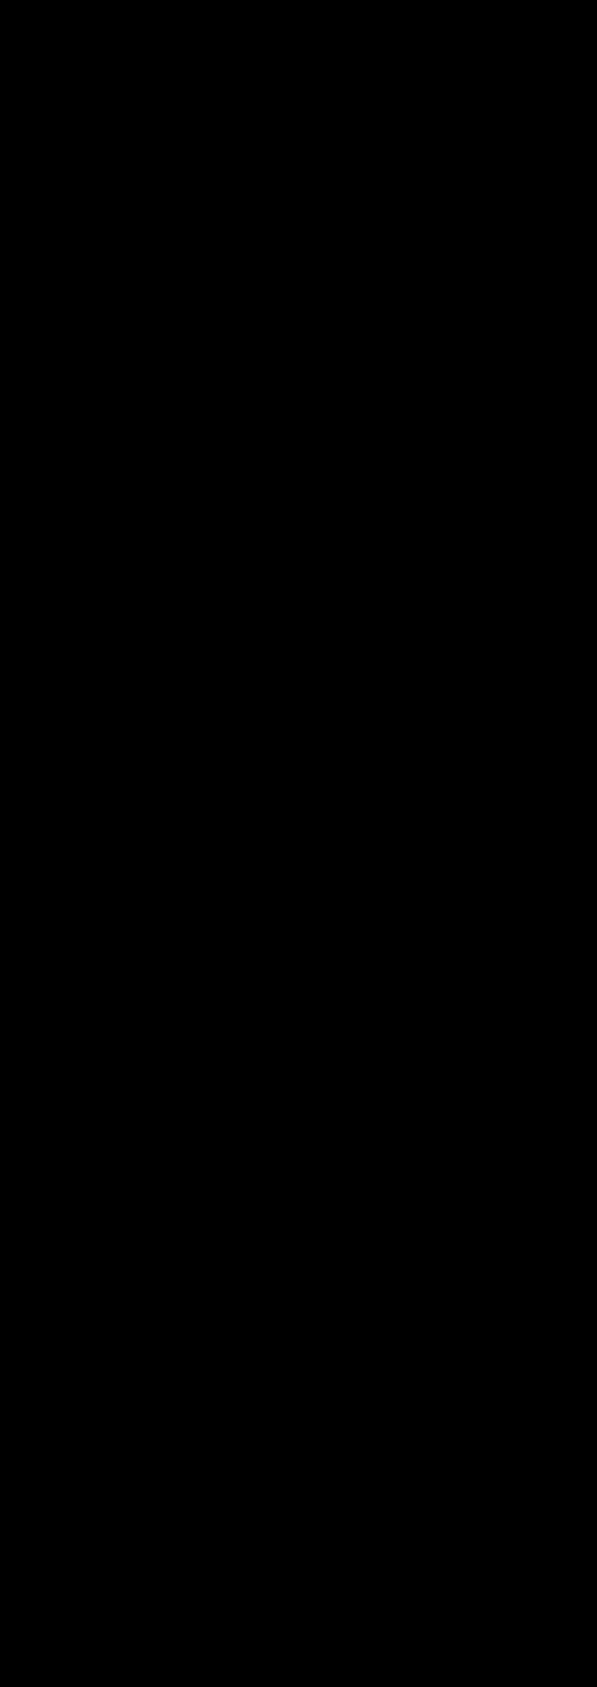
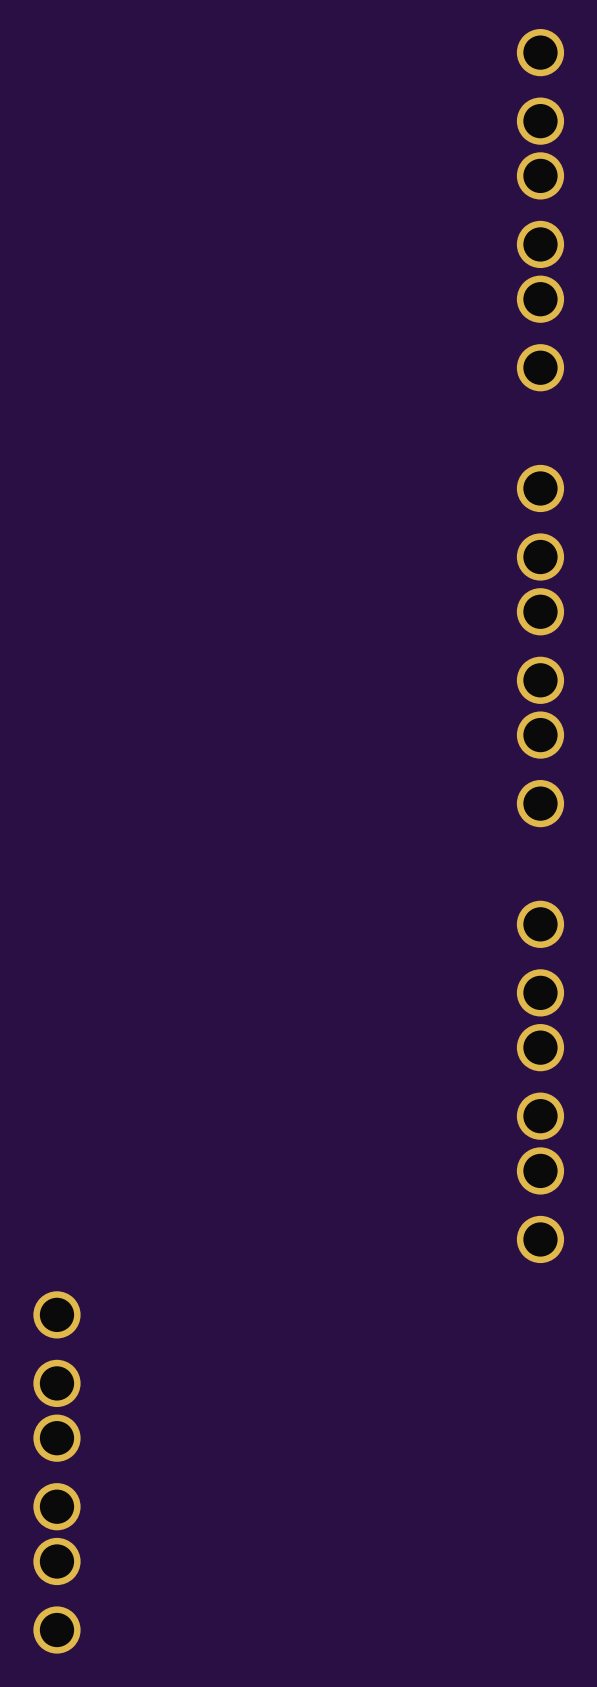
part: none -> (540, 210)
part: none -> (540, 646)
part: none -> (540, 1081)
part: none -> (56, 1472)

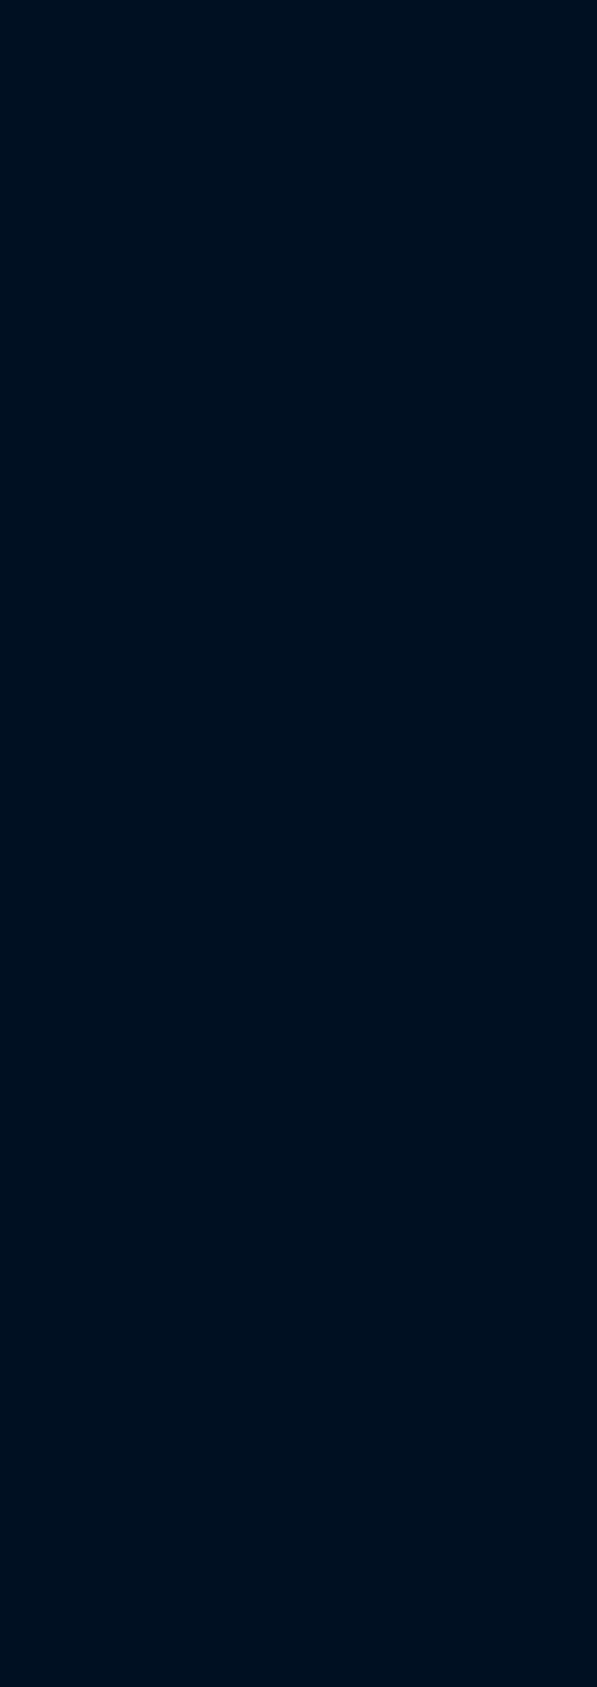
part: (540, 210) -> none
part: (540, 646) -> none
part: (540, 1081) -> none
part: (56, 1472) -> none

